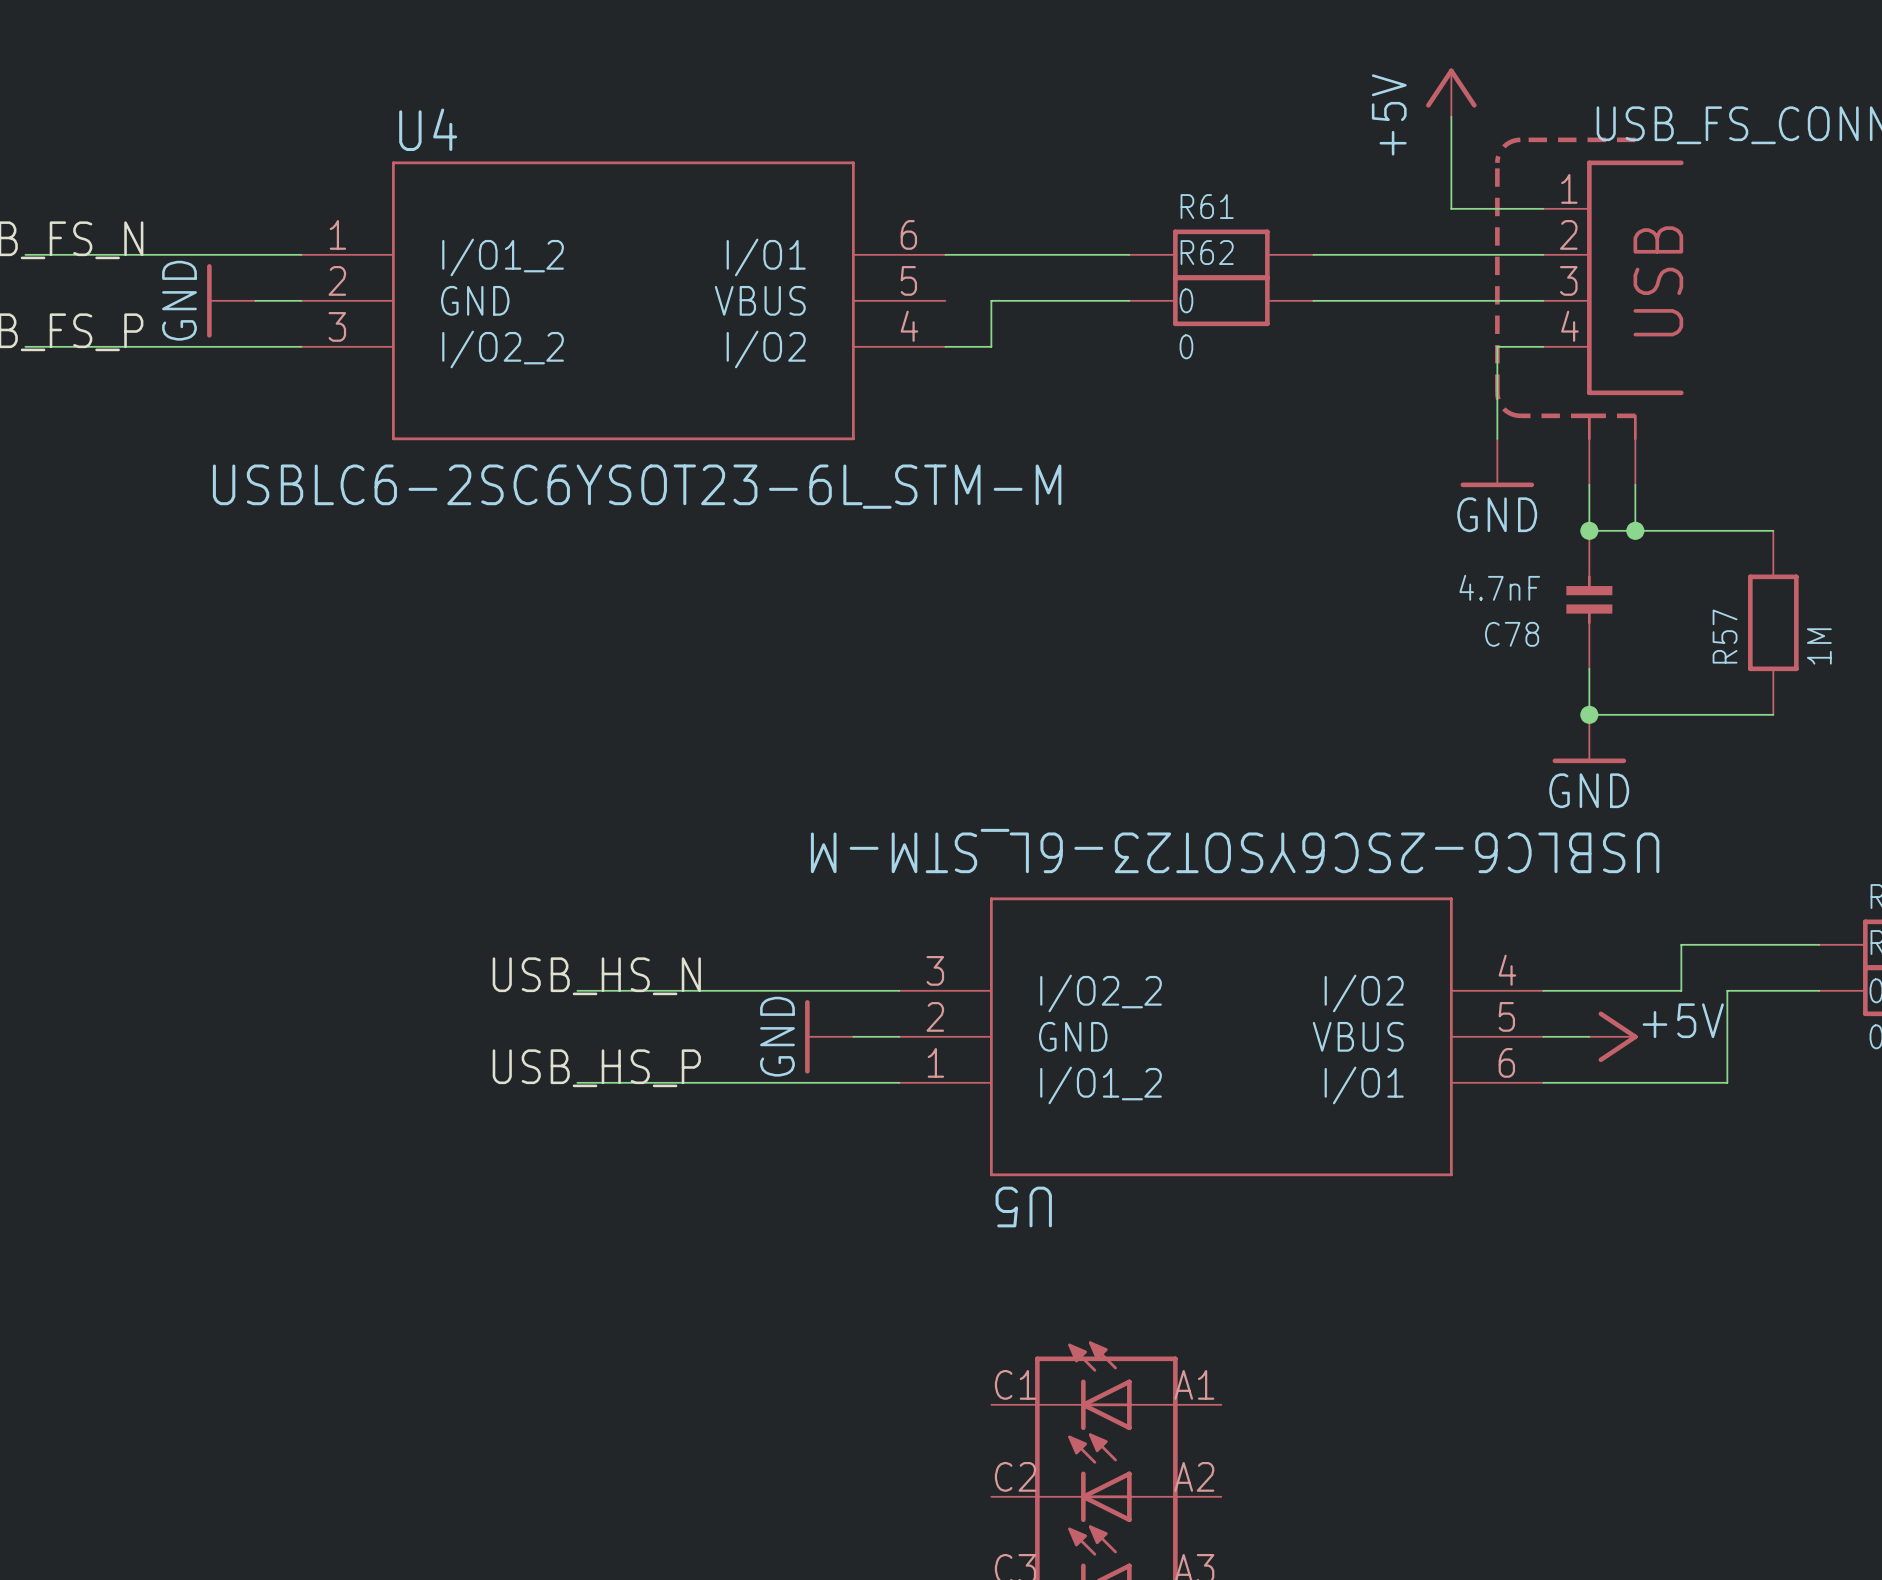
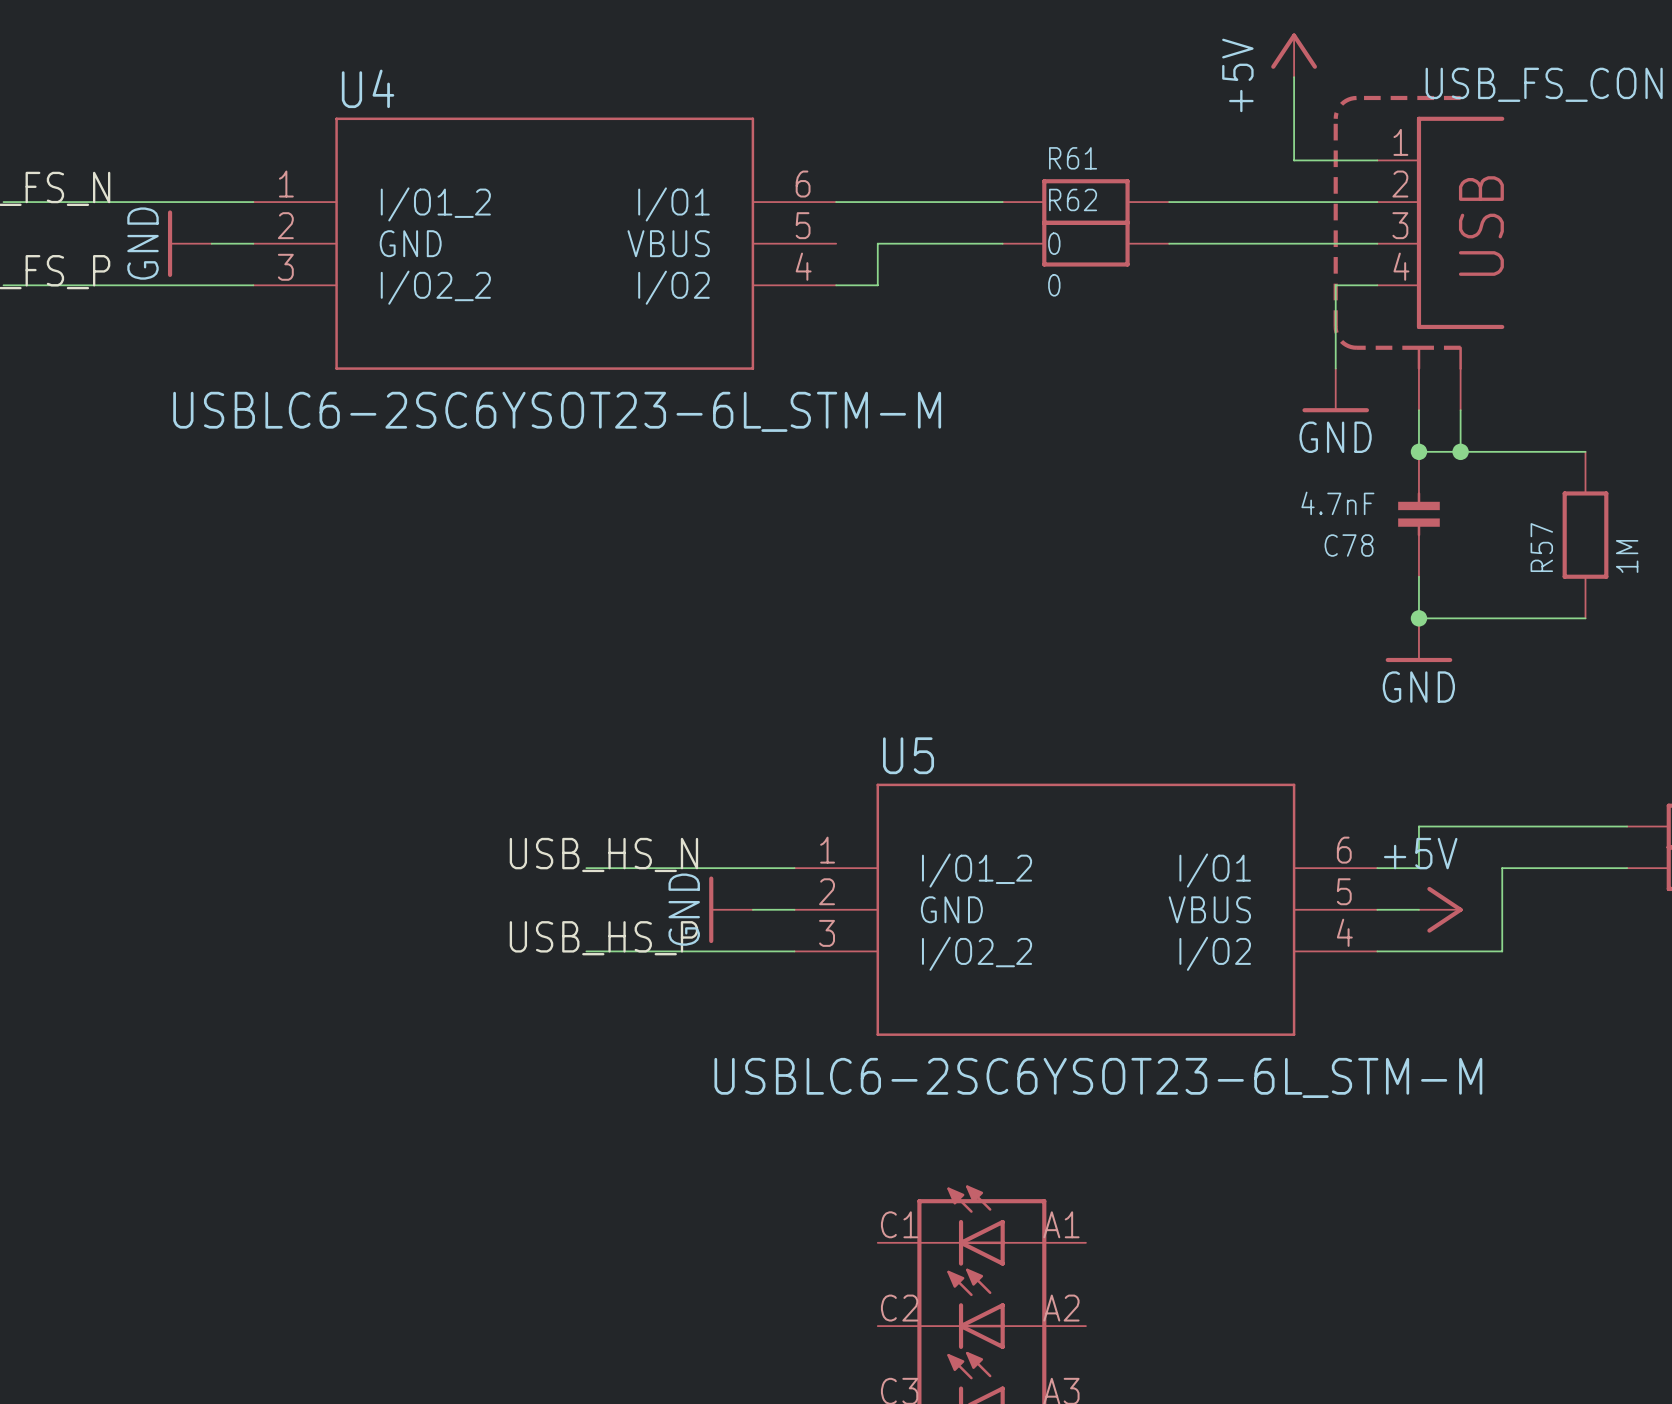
wire: (1681, 944) (1681, 990) (1589, 990) -> (1502, 826) (1418, 826) (1418, 868)
label position: USB_HS_N (596, 976) -> USB_HS_N (603, 854)
wire: (577, 990) (669, 990) -> none
wire: (1727, 990) (1727, 1082) (1681, 1082) -> (1543, 868) (1502, 868) (1502, 951)
power symbol text position: +5V (1683, 1020) -> +5V (1420, 853)
U5 flip: as is (1221, 1036) -> up-down (1085, 909)
label position: USB_HS_P (596, 1068) -> USB_HS_P (603, 938)
wire: (577, 1082) (669, 1082) -> none

